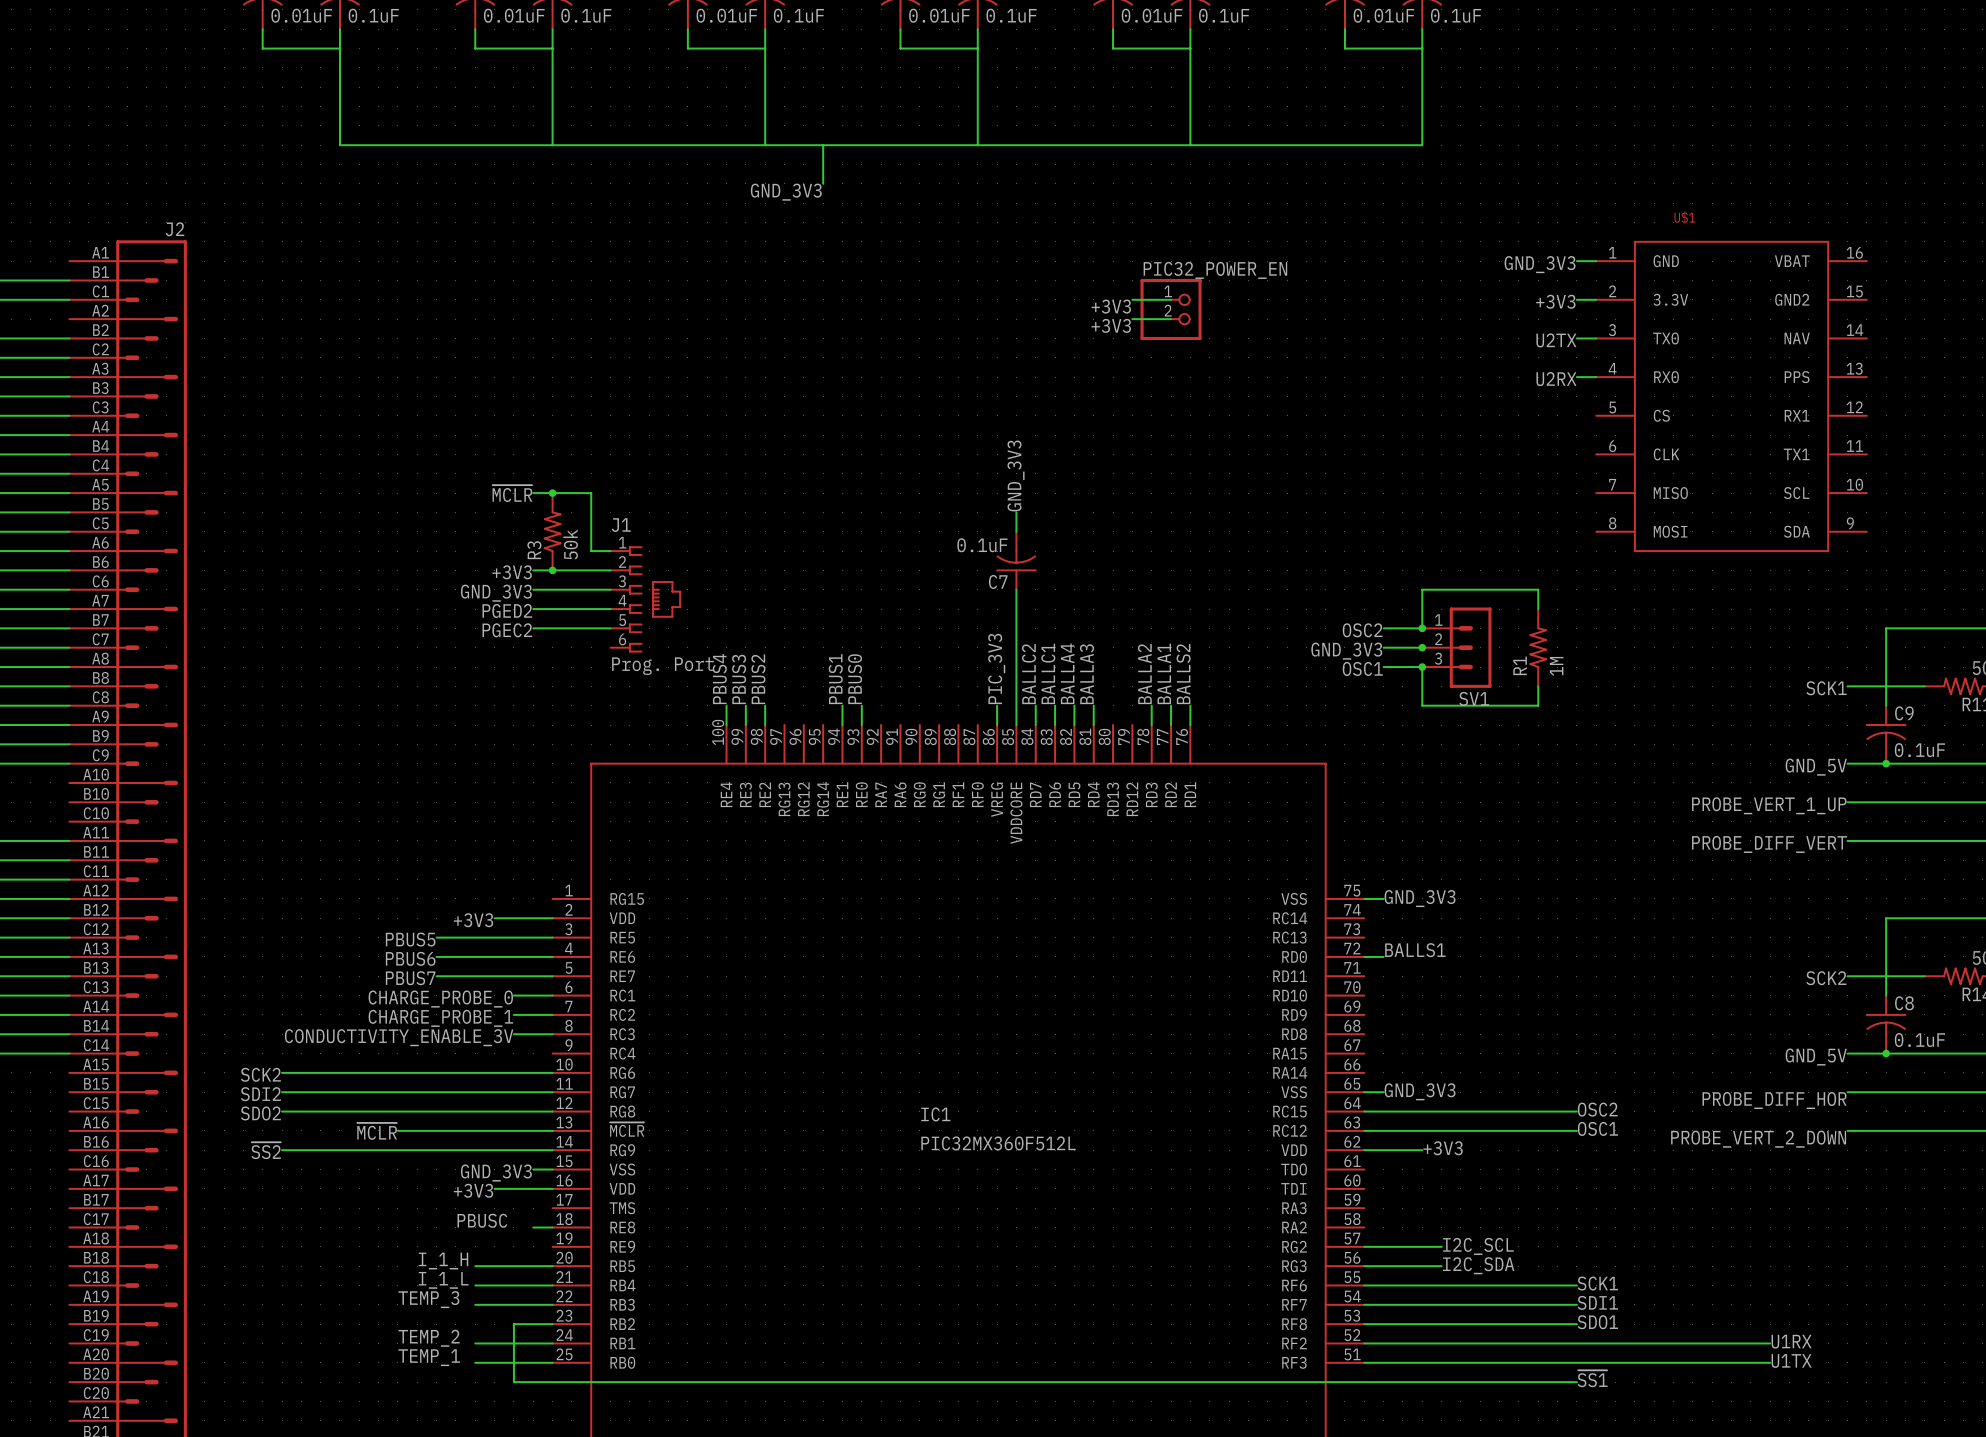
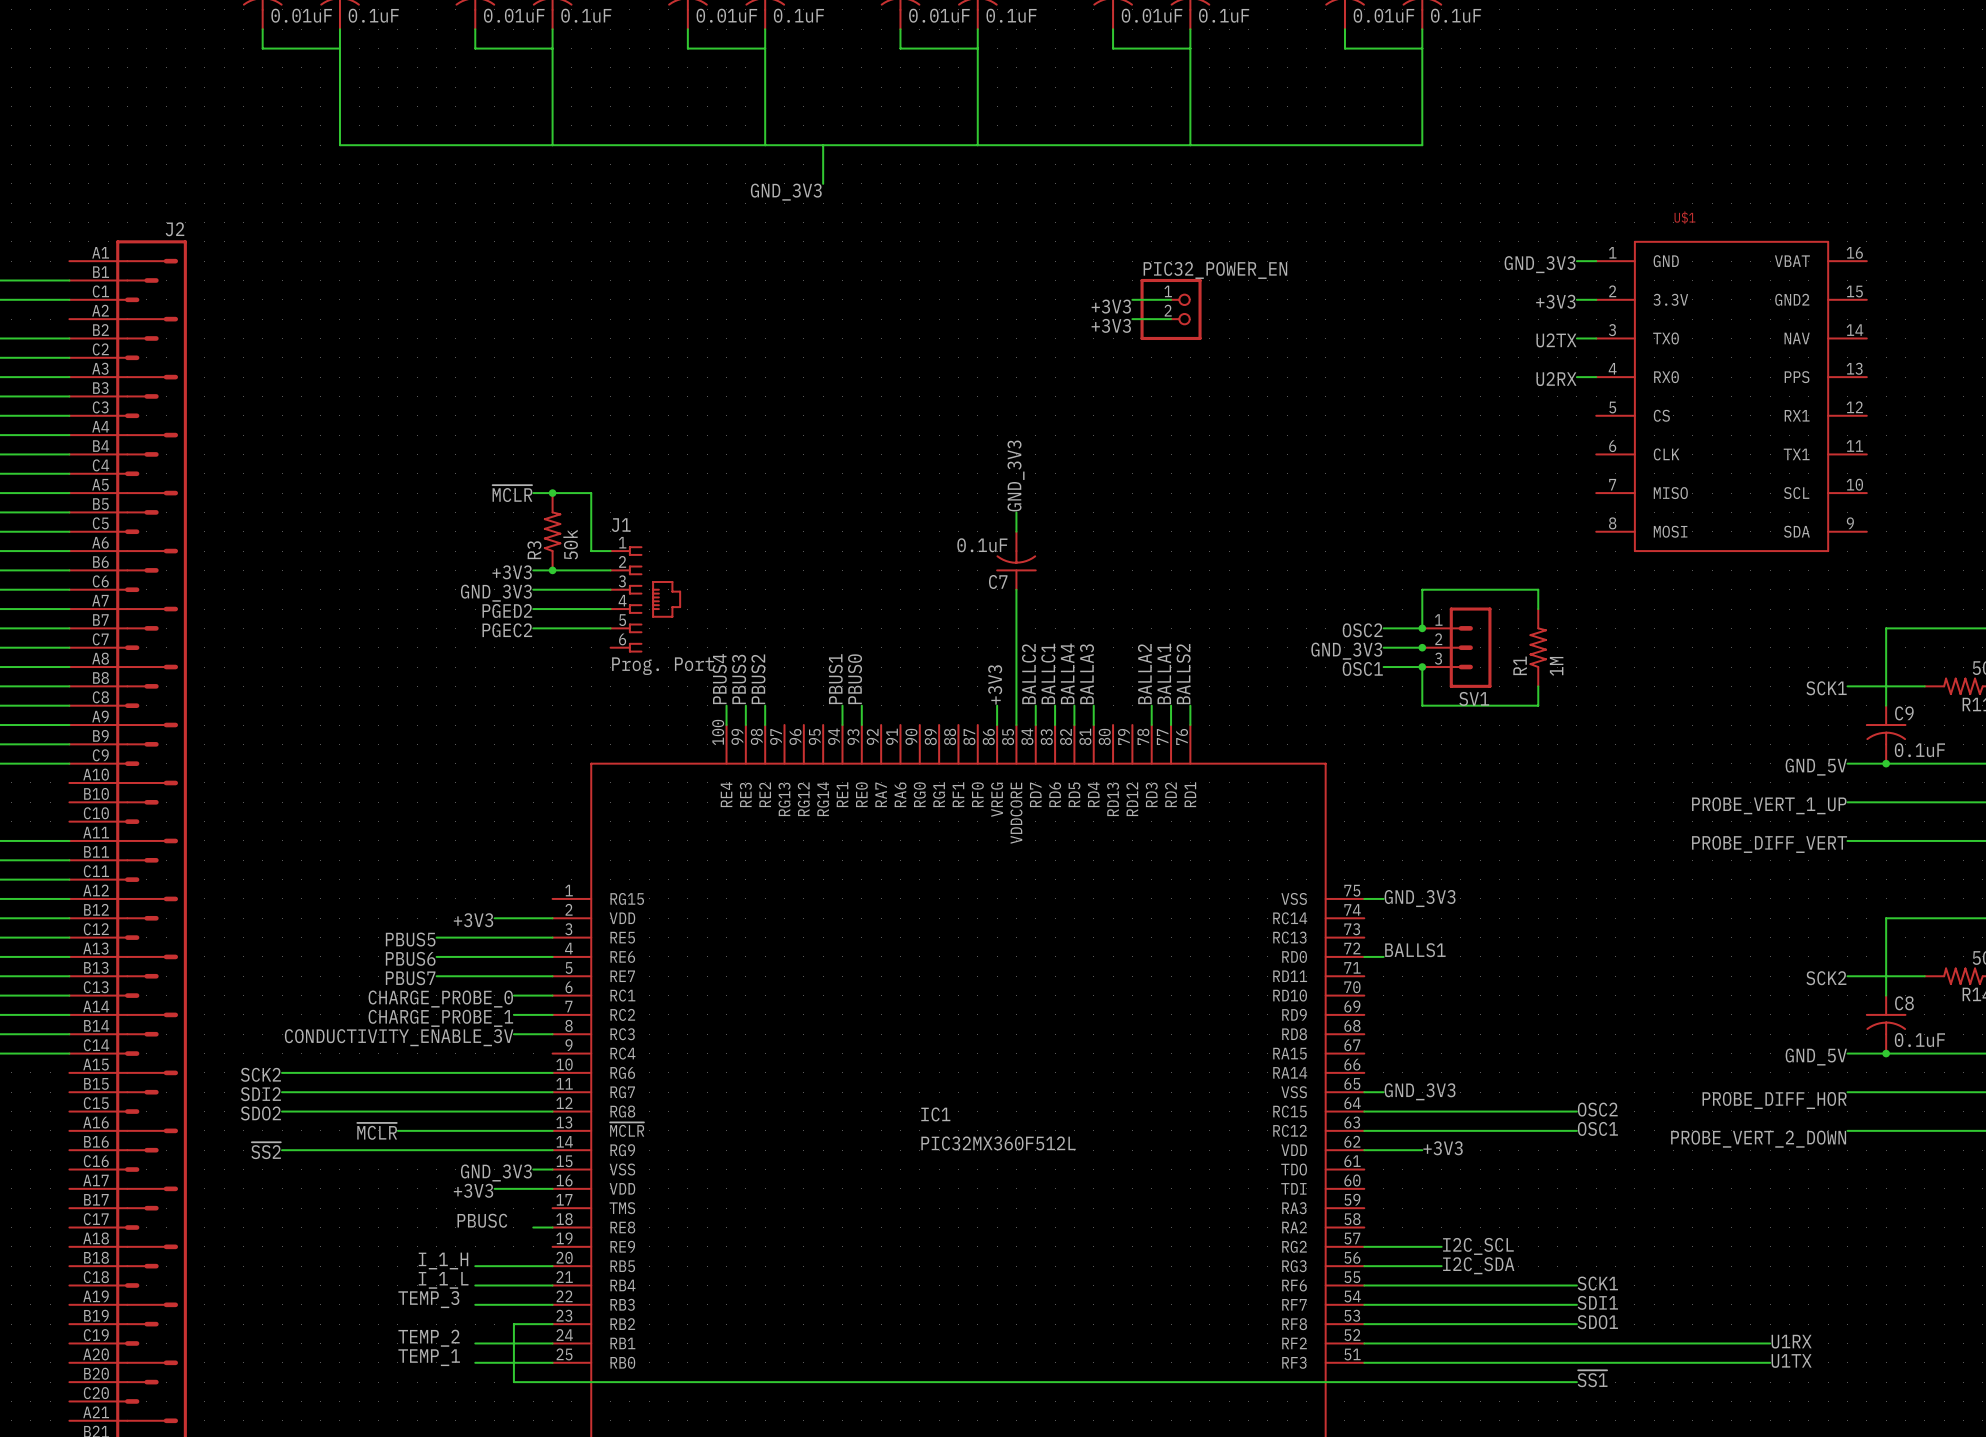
label: PIC_3V3 (996, 668) -> +3V3 (995, 684)

